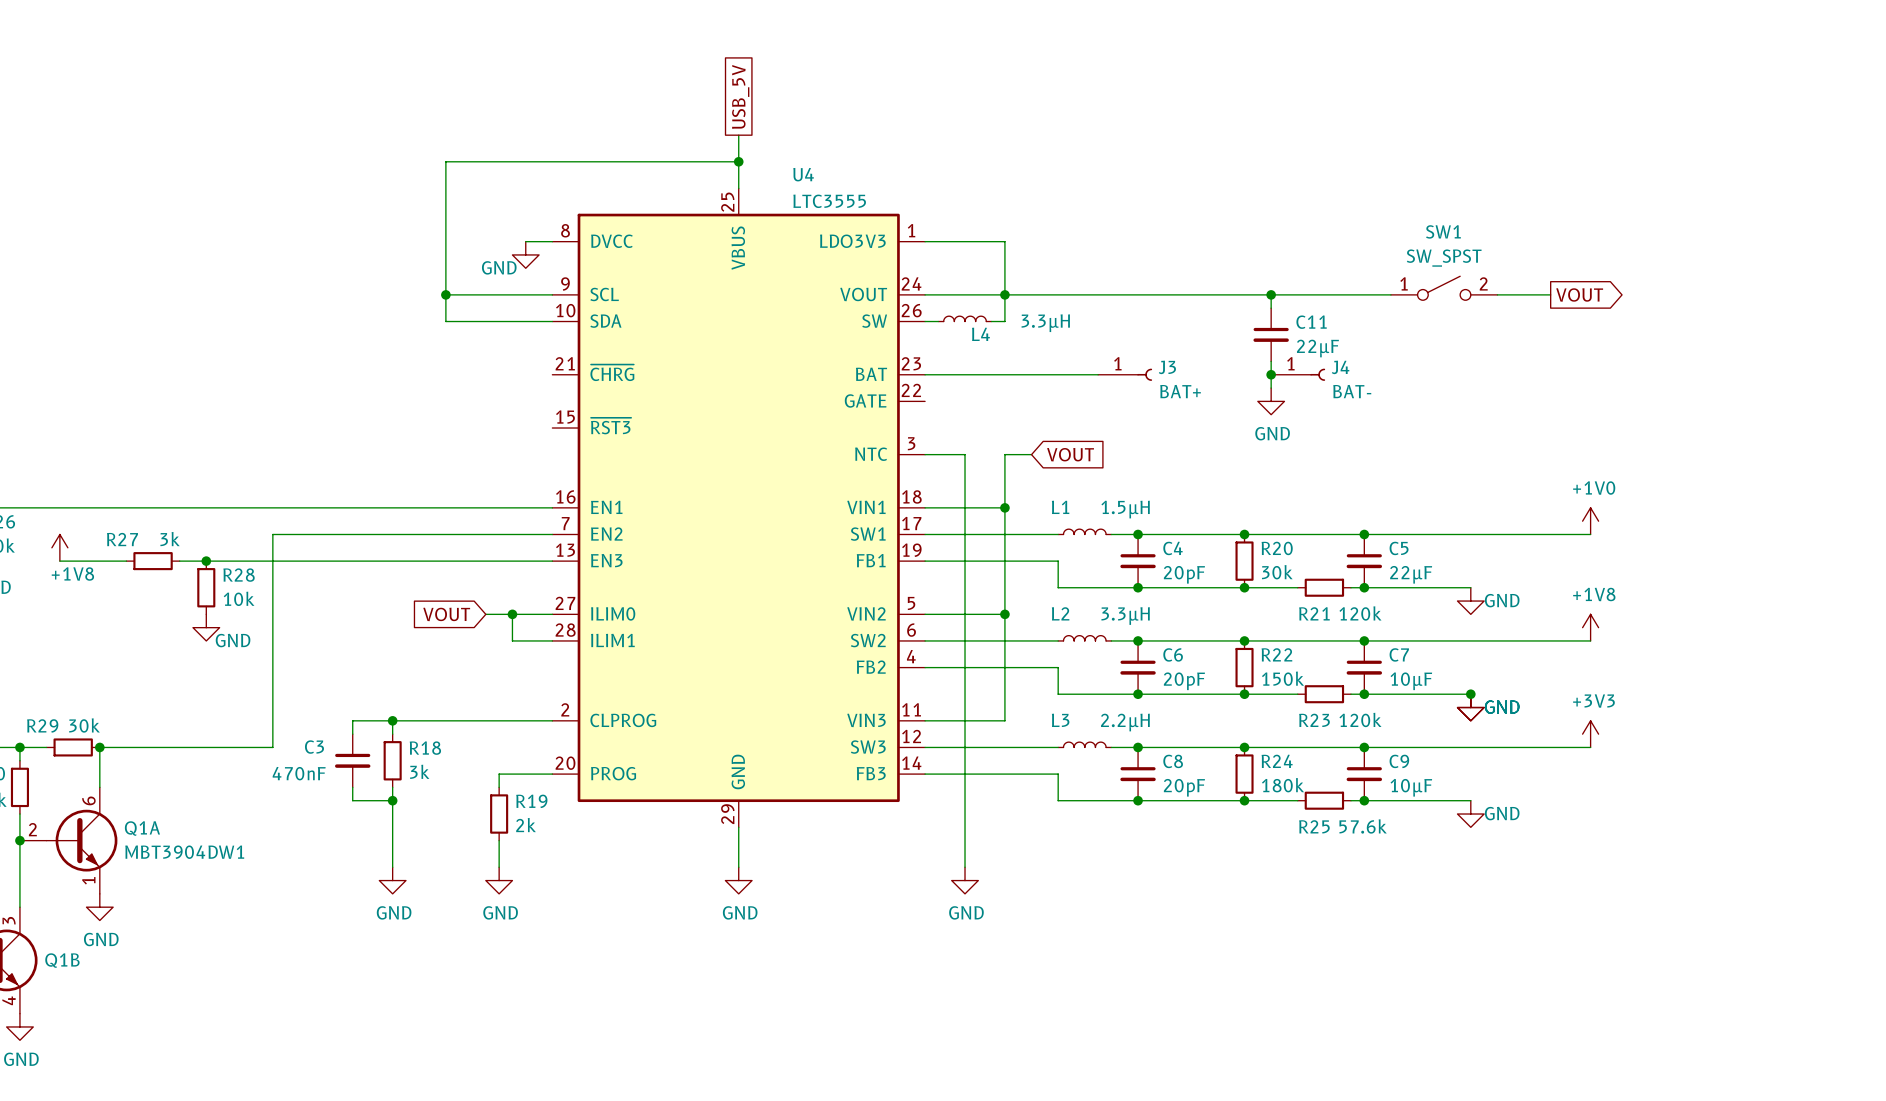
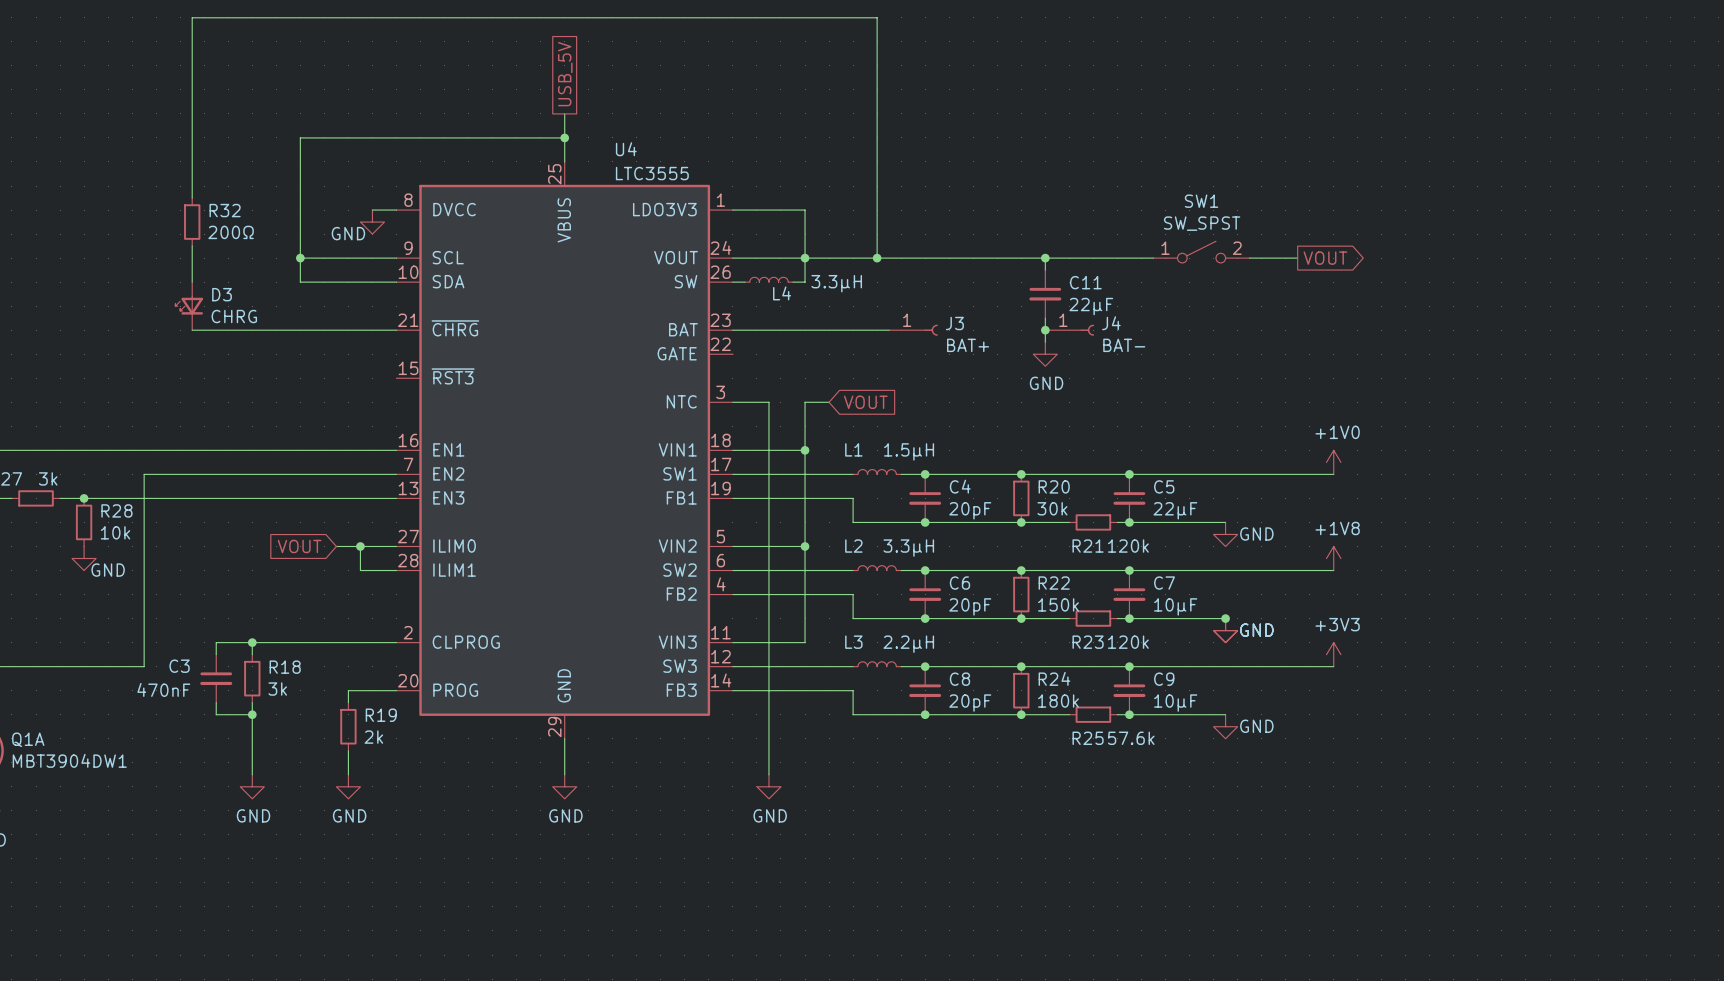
wire: none -> (192, 198) (192, 17) (877, 17) (877, 258)
R32: none -> 200Ω (192, 222)
wire: none -> (192, 246) (192, 282)
junction: none -> (877, 258)
D3: none -> CHRG (189, 306)
wire: none -> (192, 330) (396, 330)

